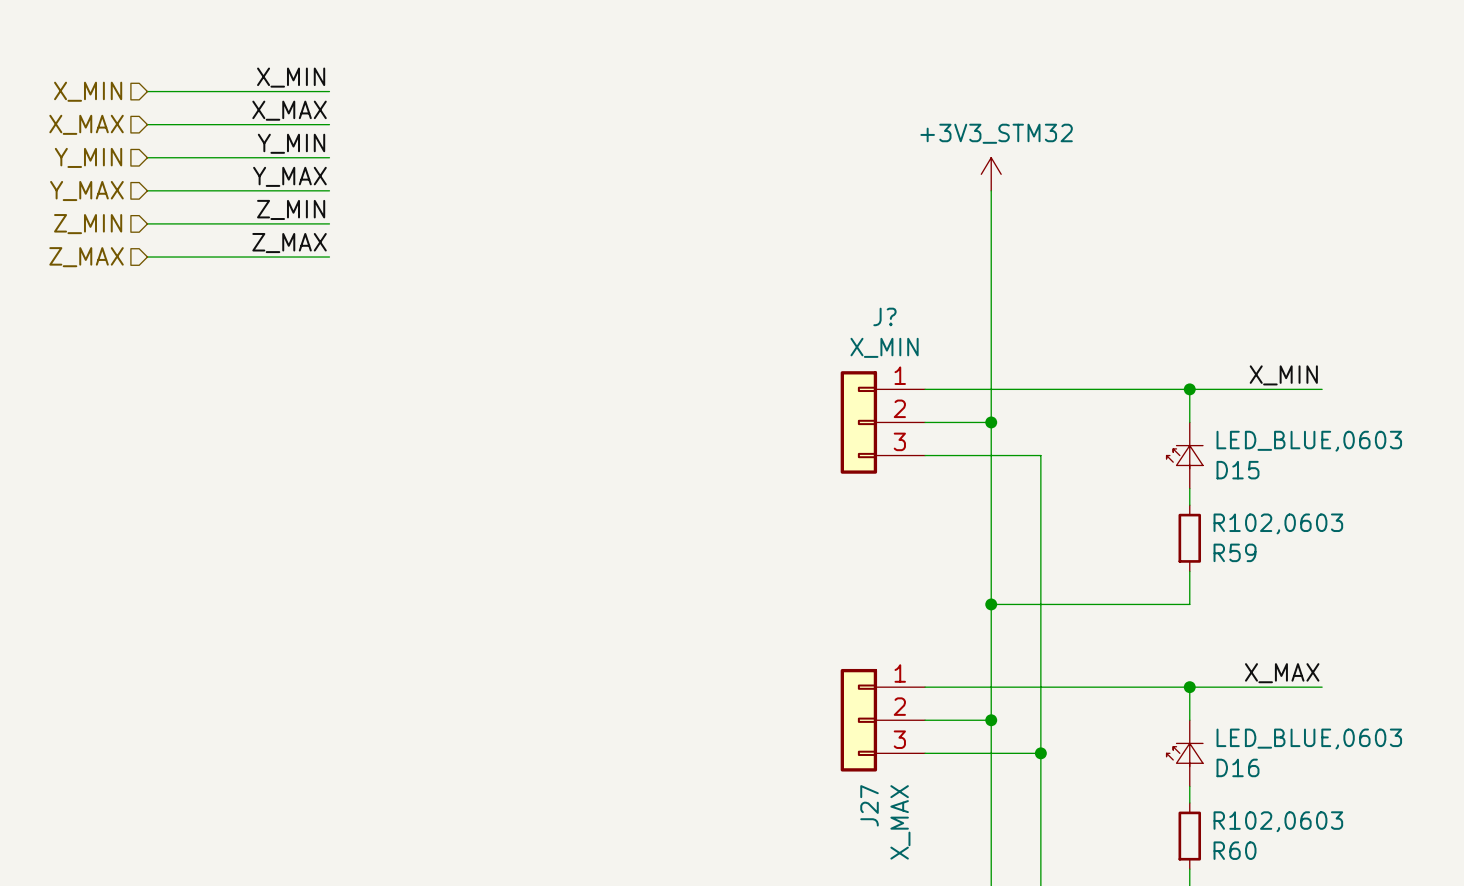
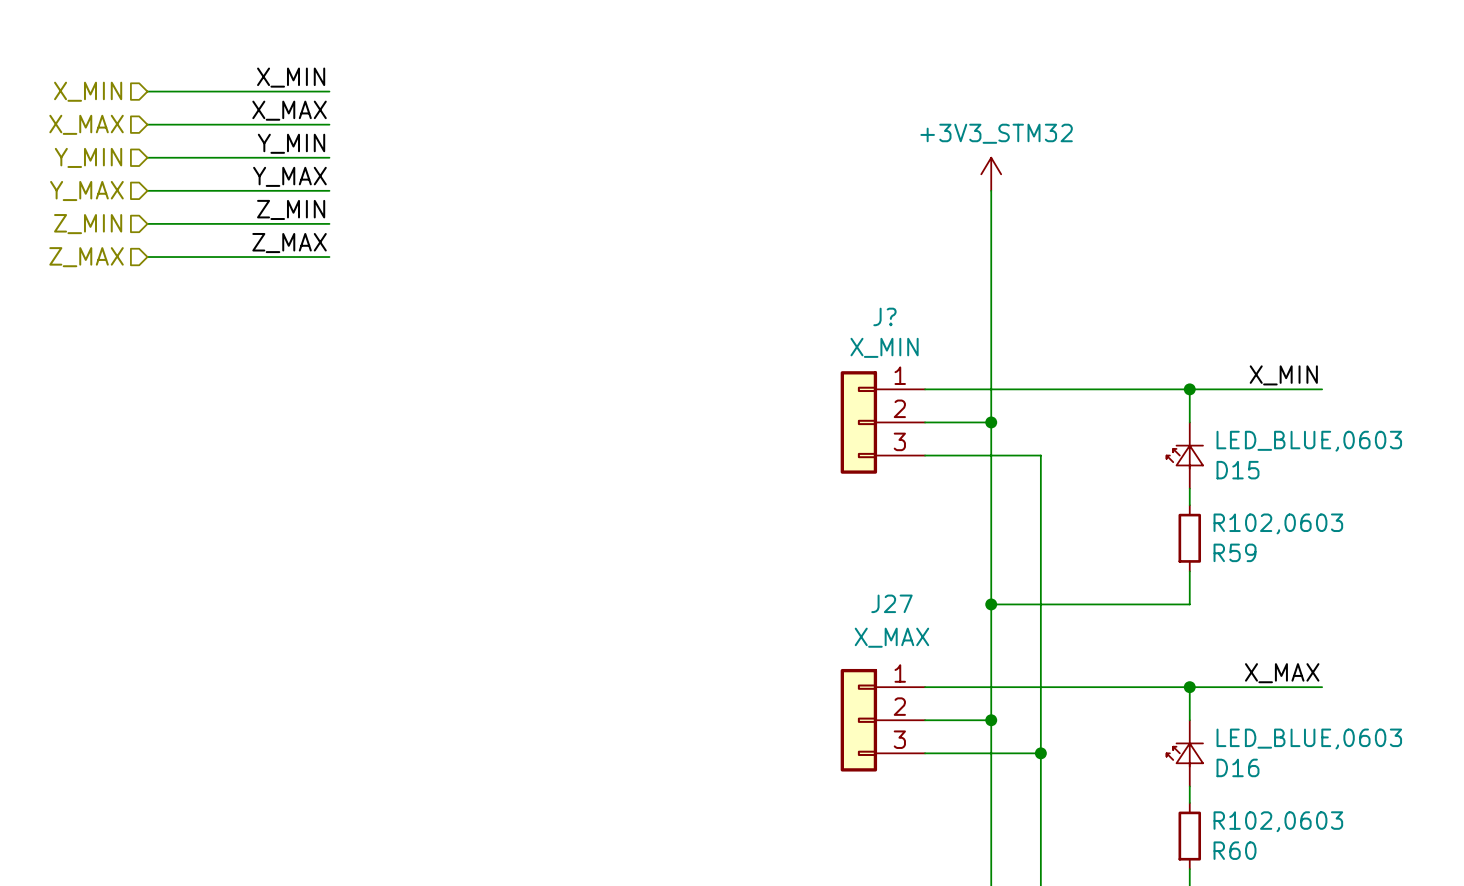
J27 name rotation: 0° (869, 805) -> 90° clockwise (891, 603)
J27 name position: J27 (869, 805) -> J27 (891, 603)
J27 value rotation: 0° (900, 822) -> 90° clockwise (891, 637)
J27 value position: X_MAX (900, 822) -> X_MAX (891, 637)

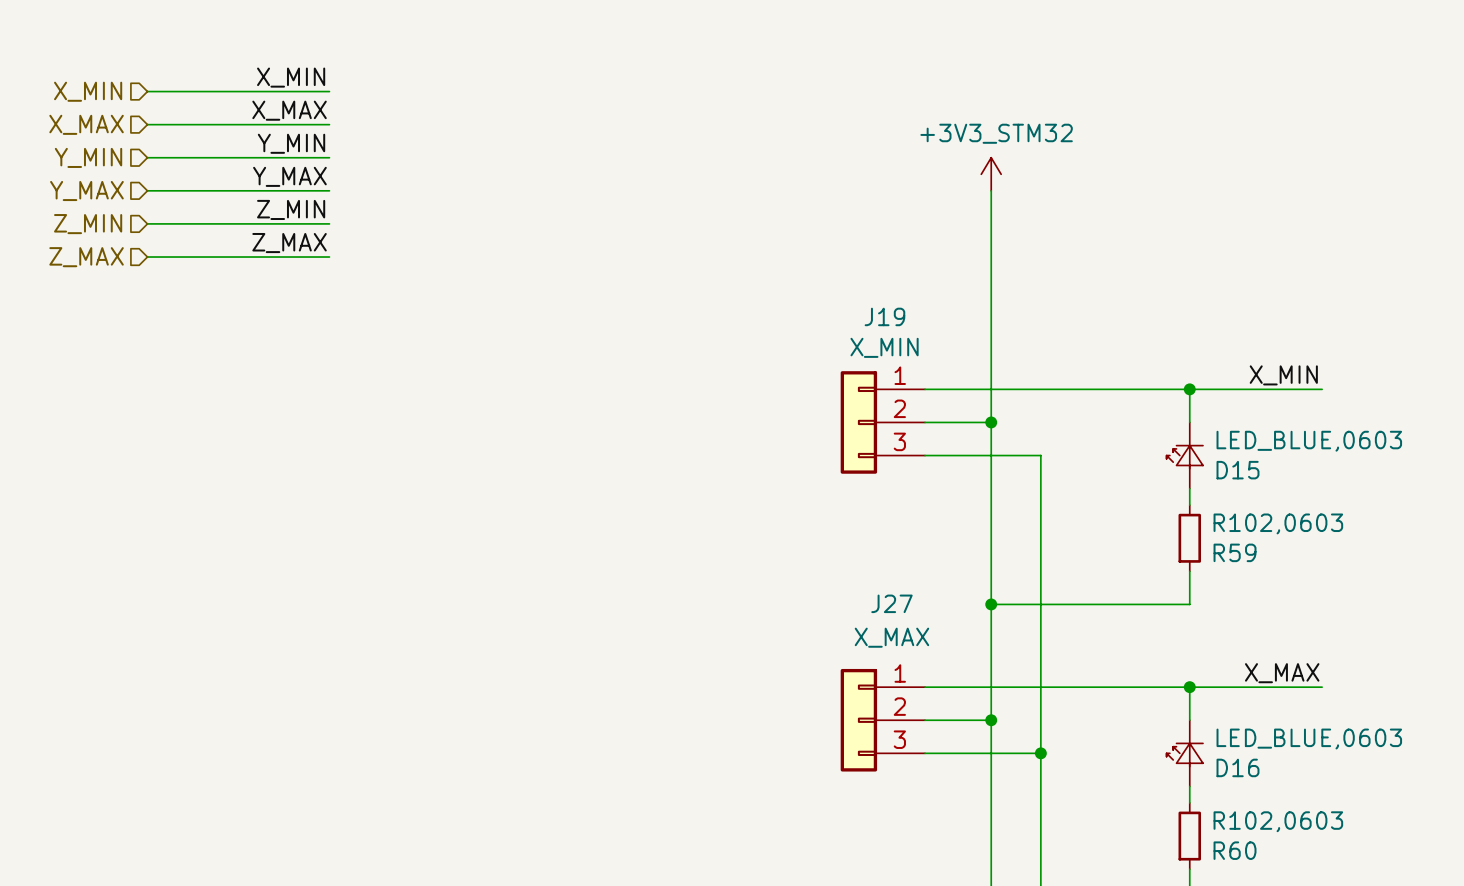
J? name: J? (884, 316) -> J19 (884, 316)

